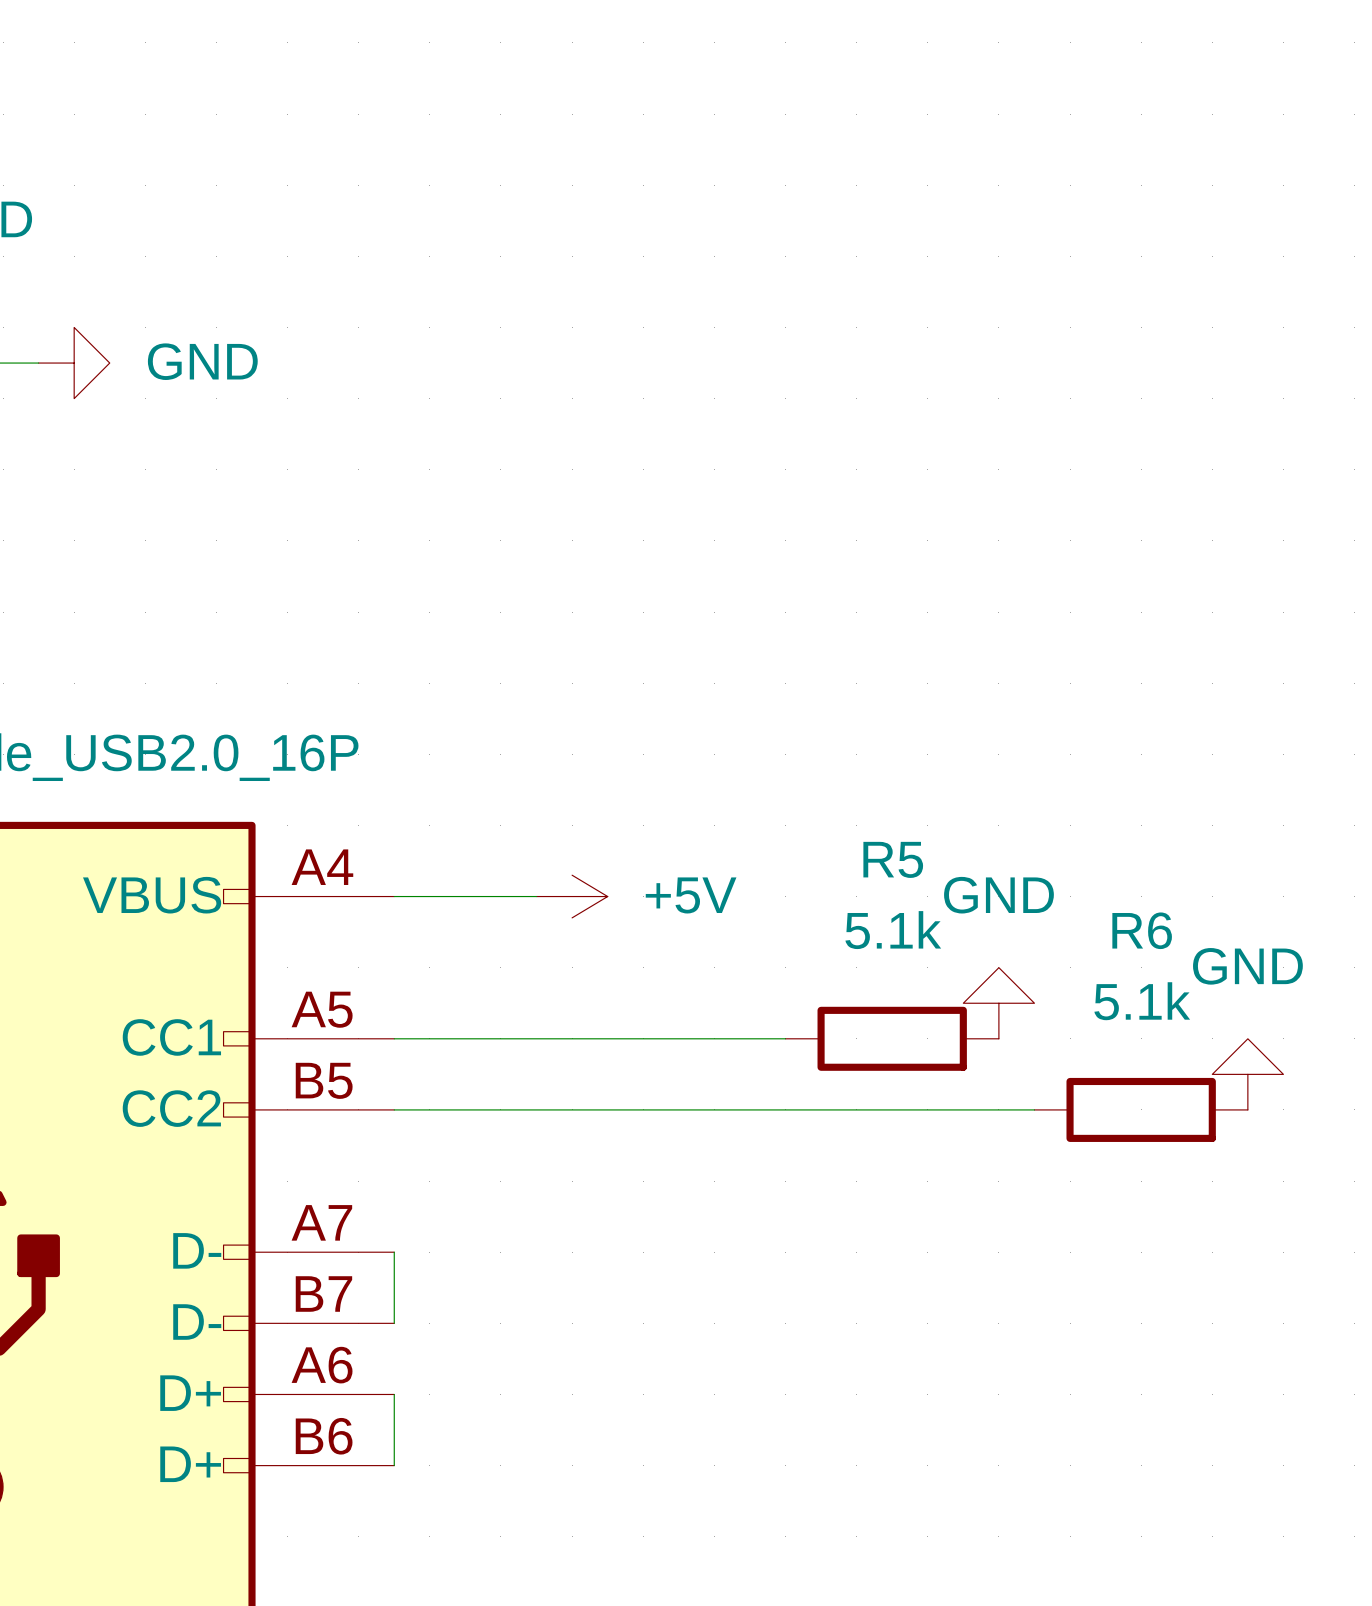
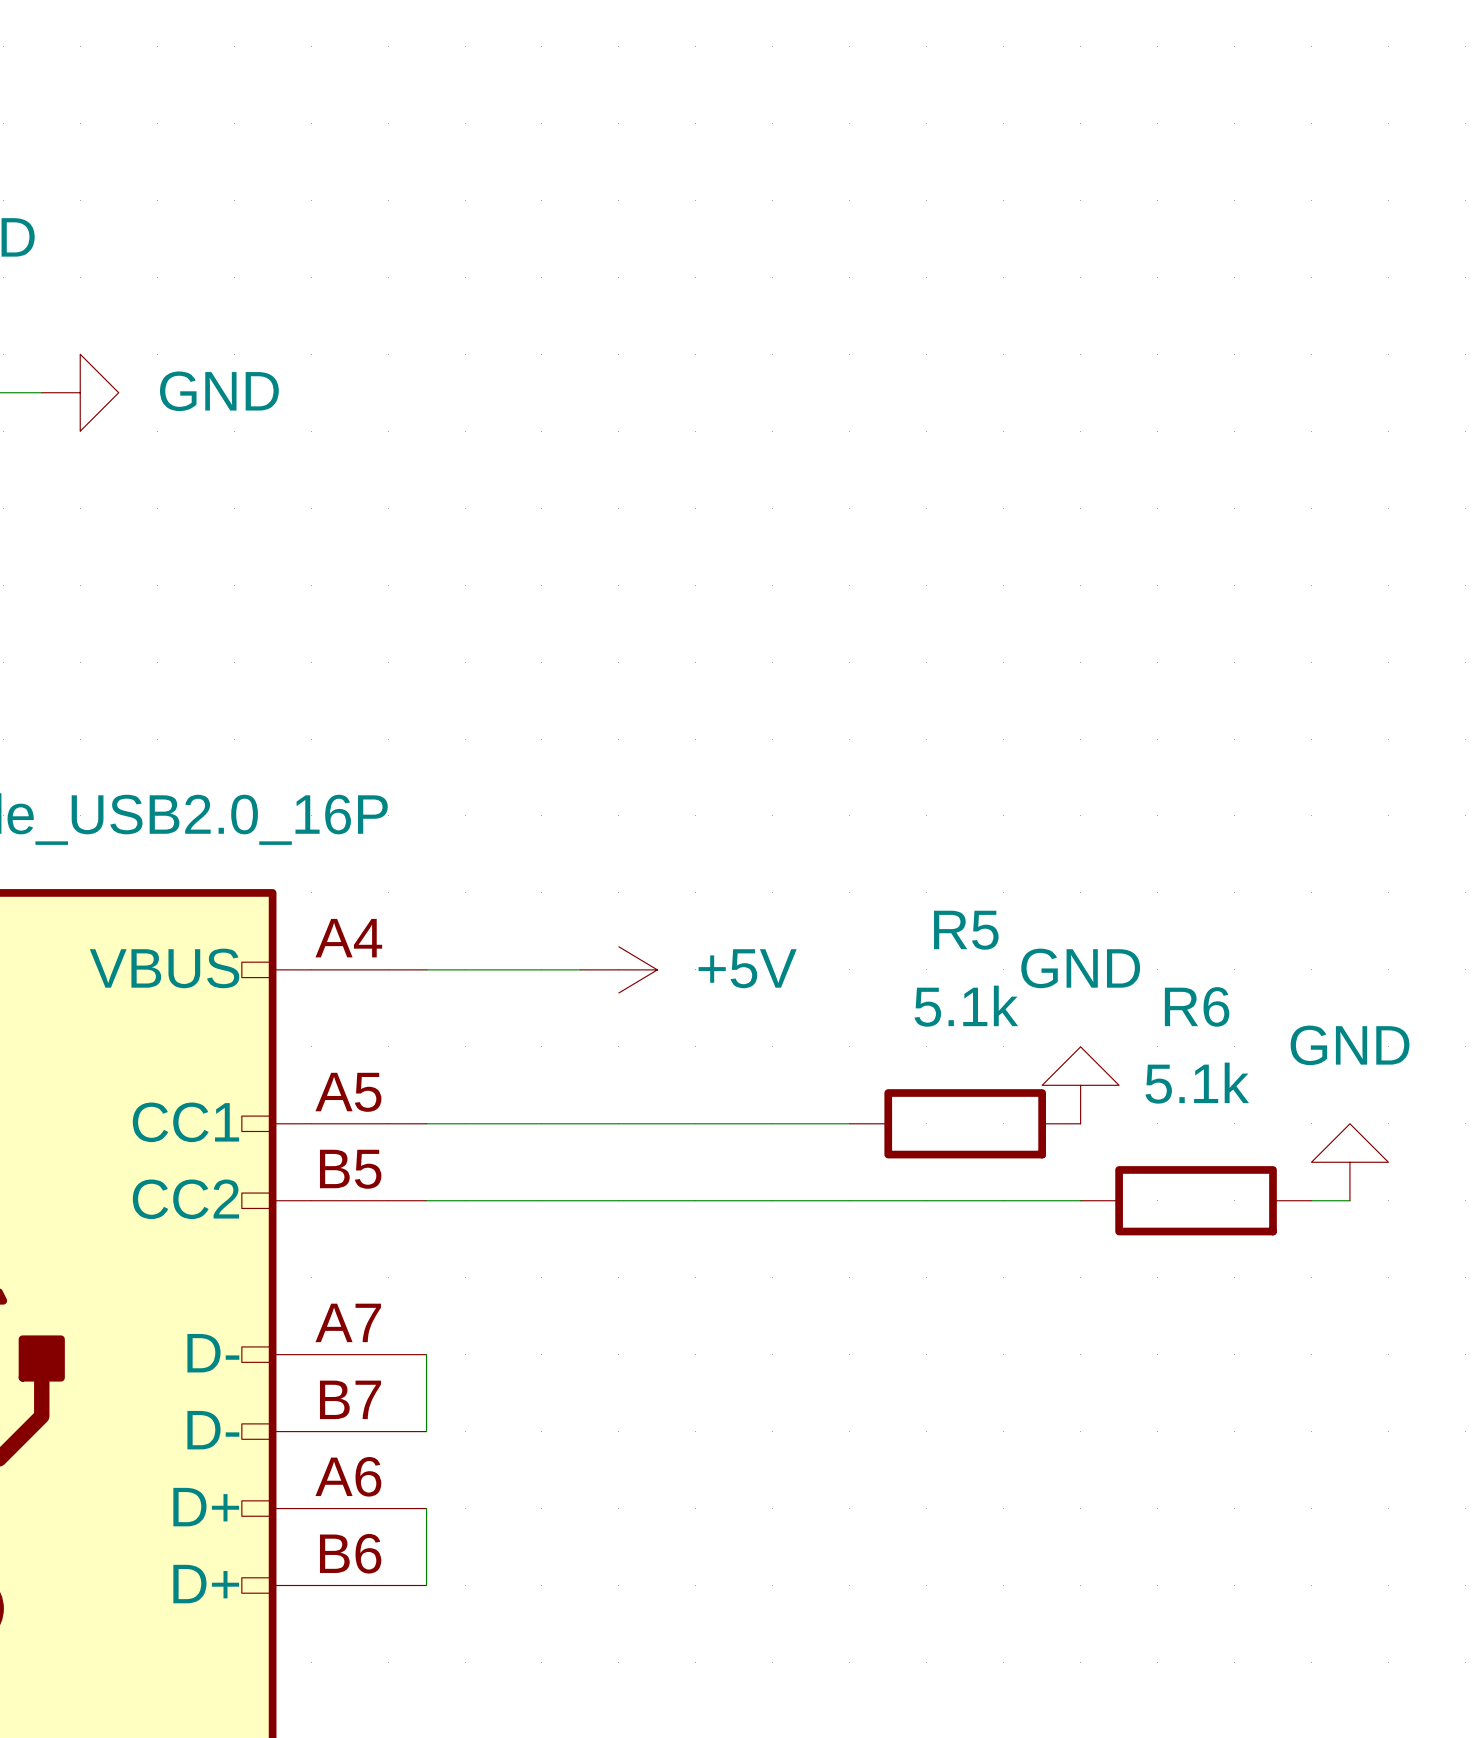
R6 position: (1141, 1109) -> (1196, 1200)

